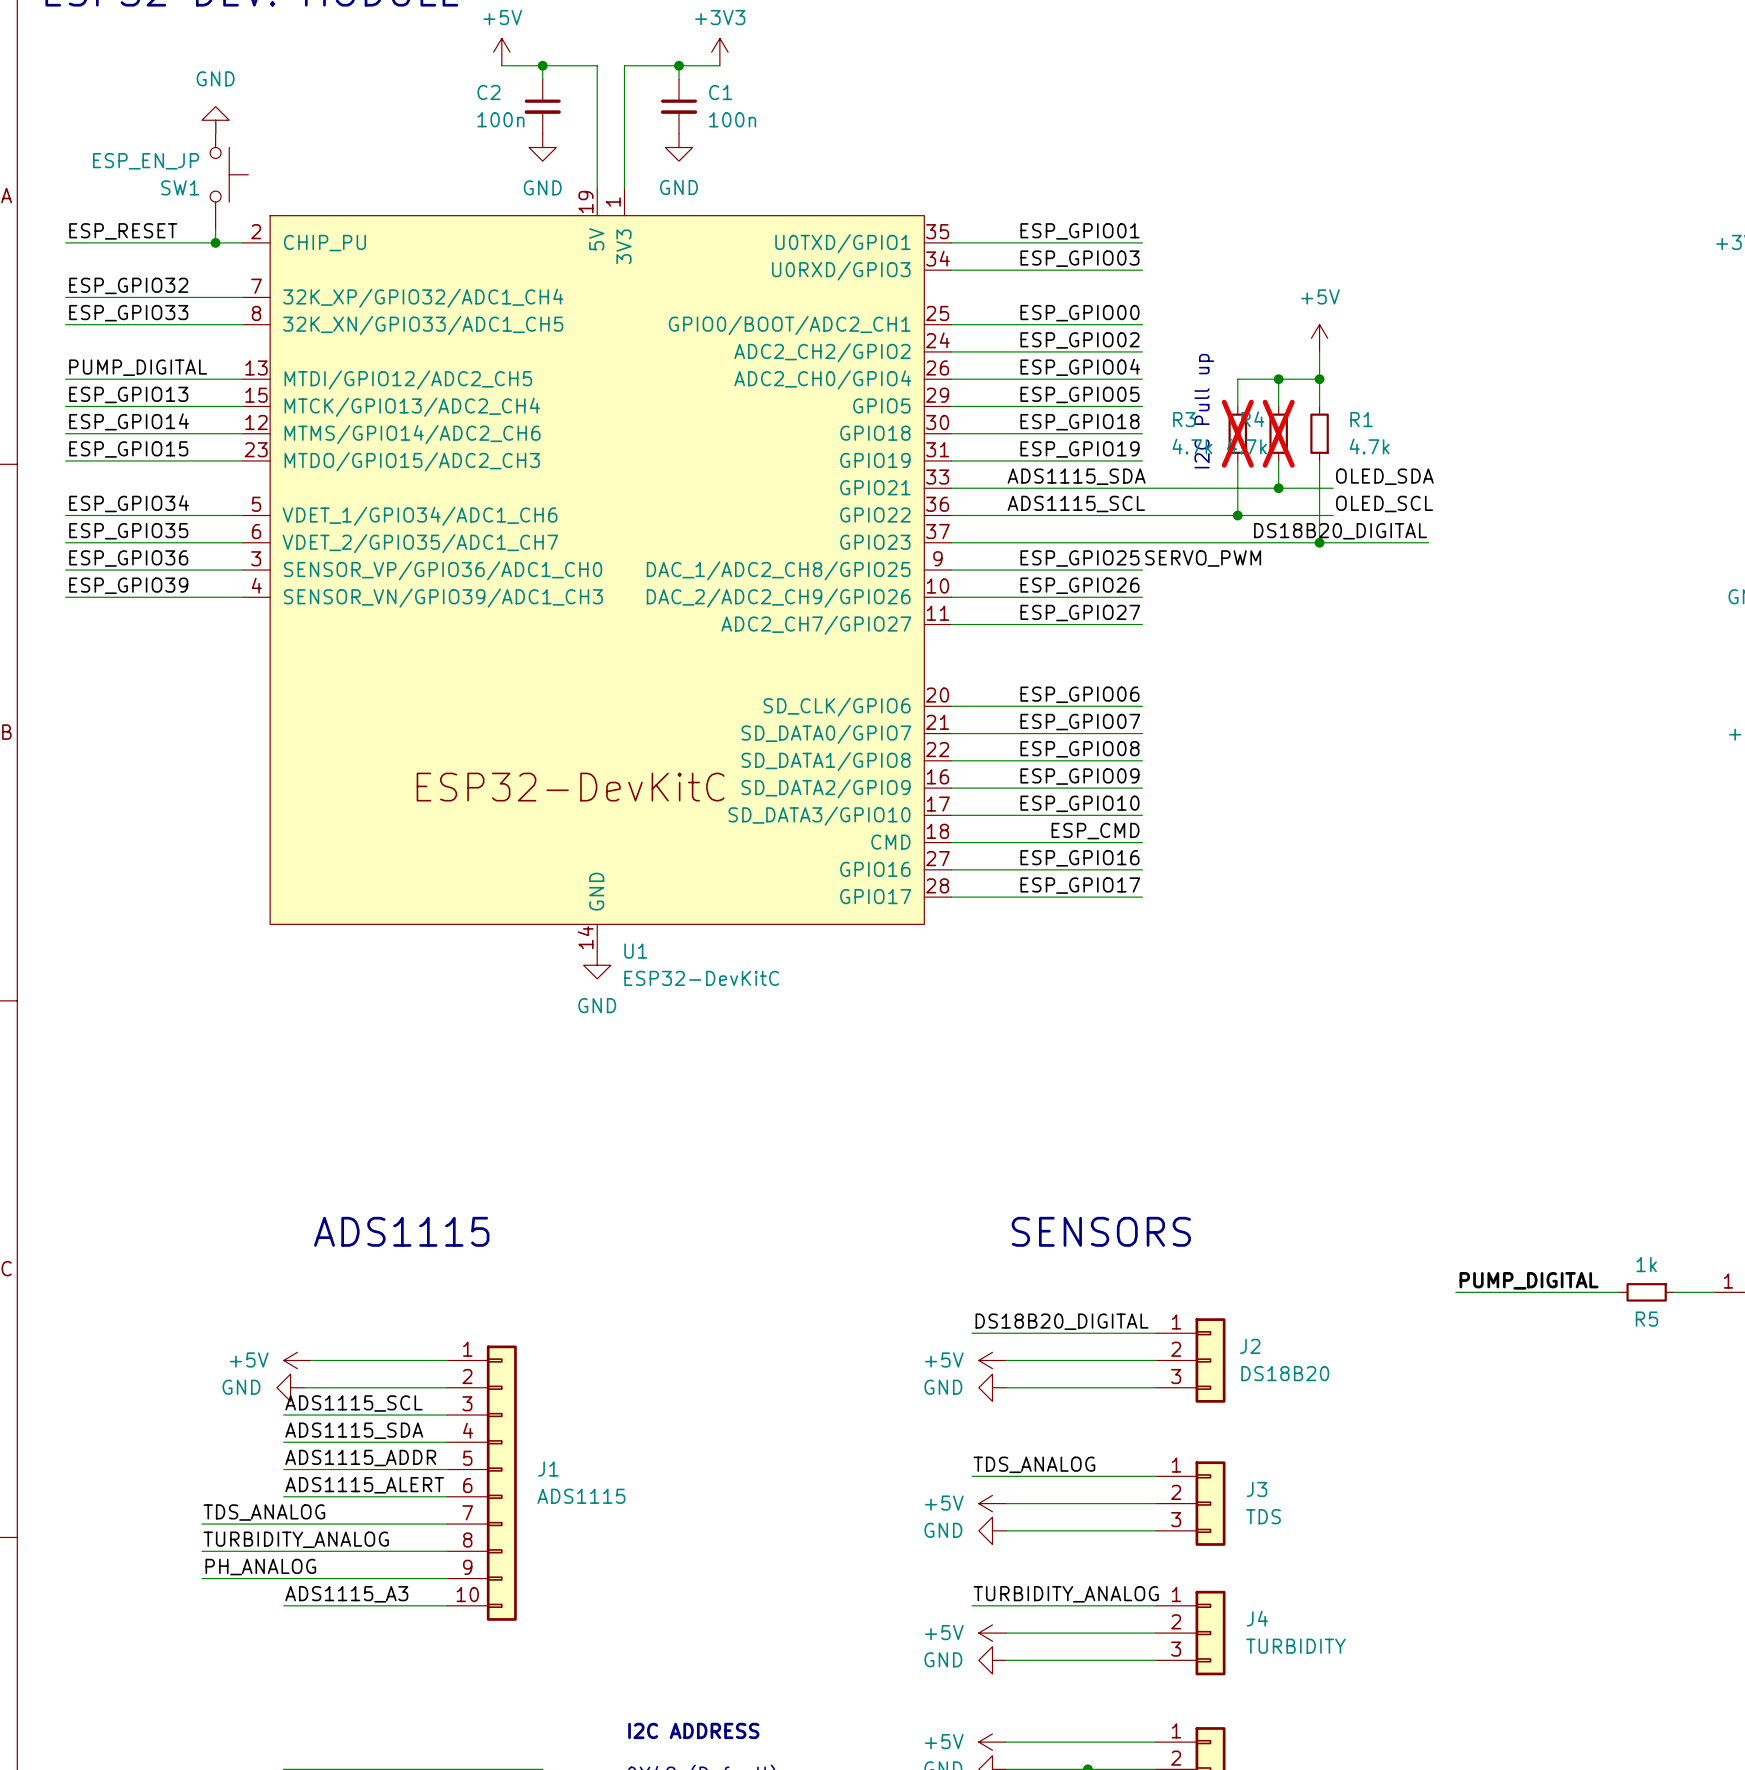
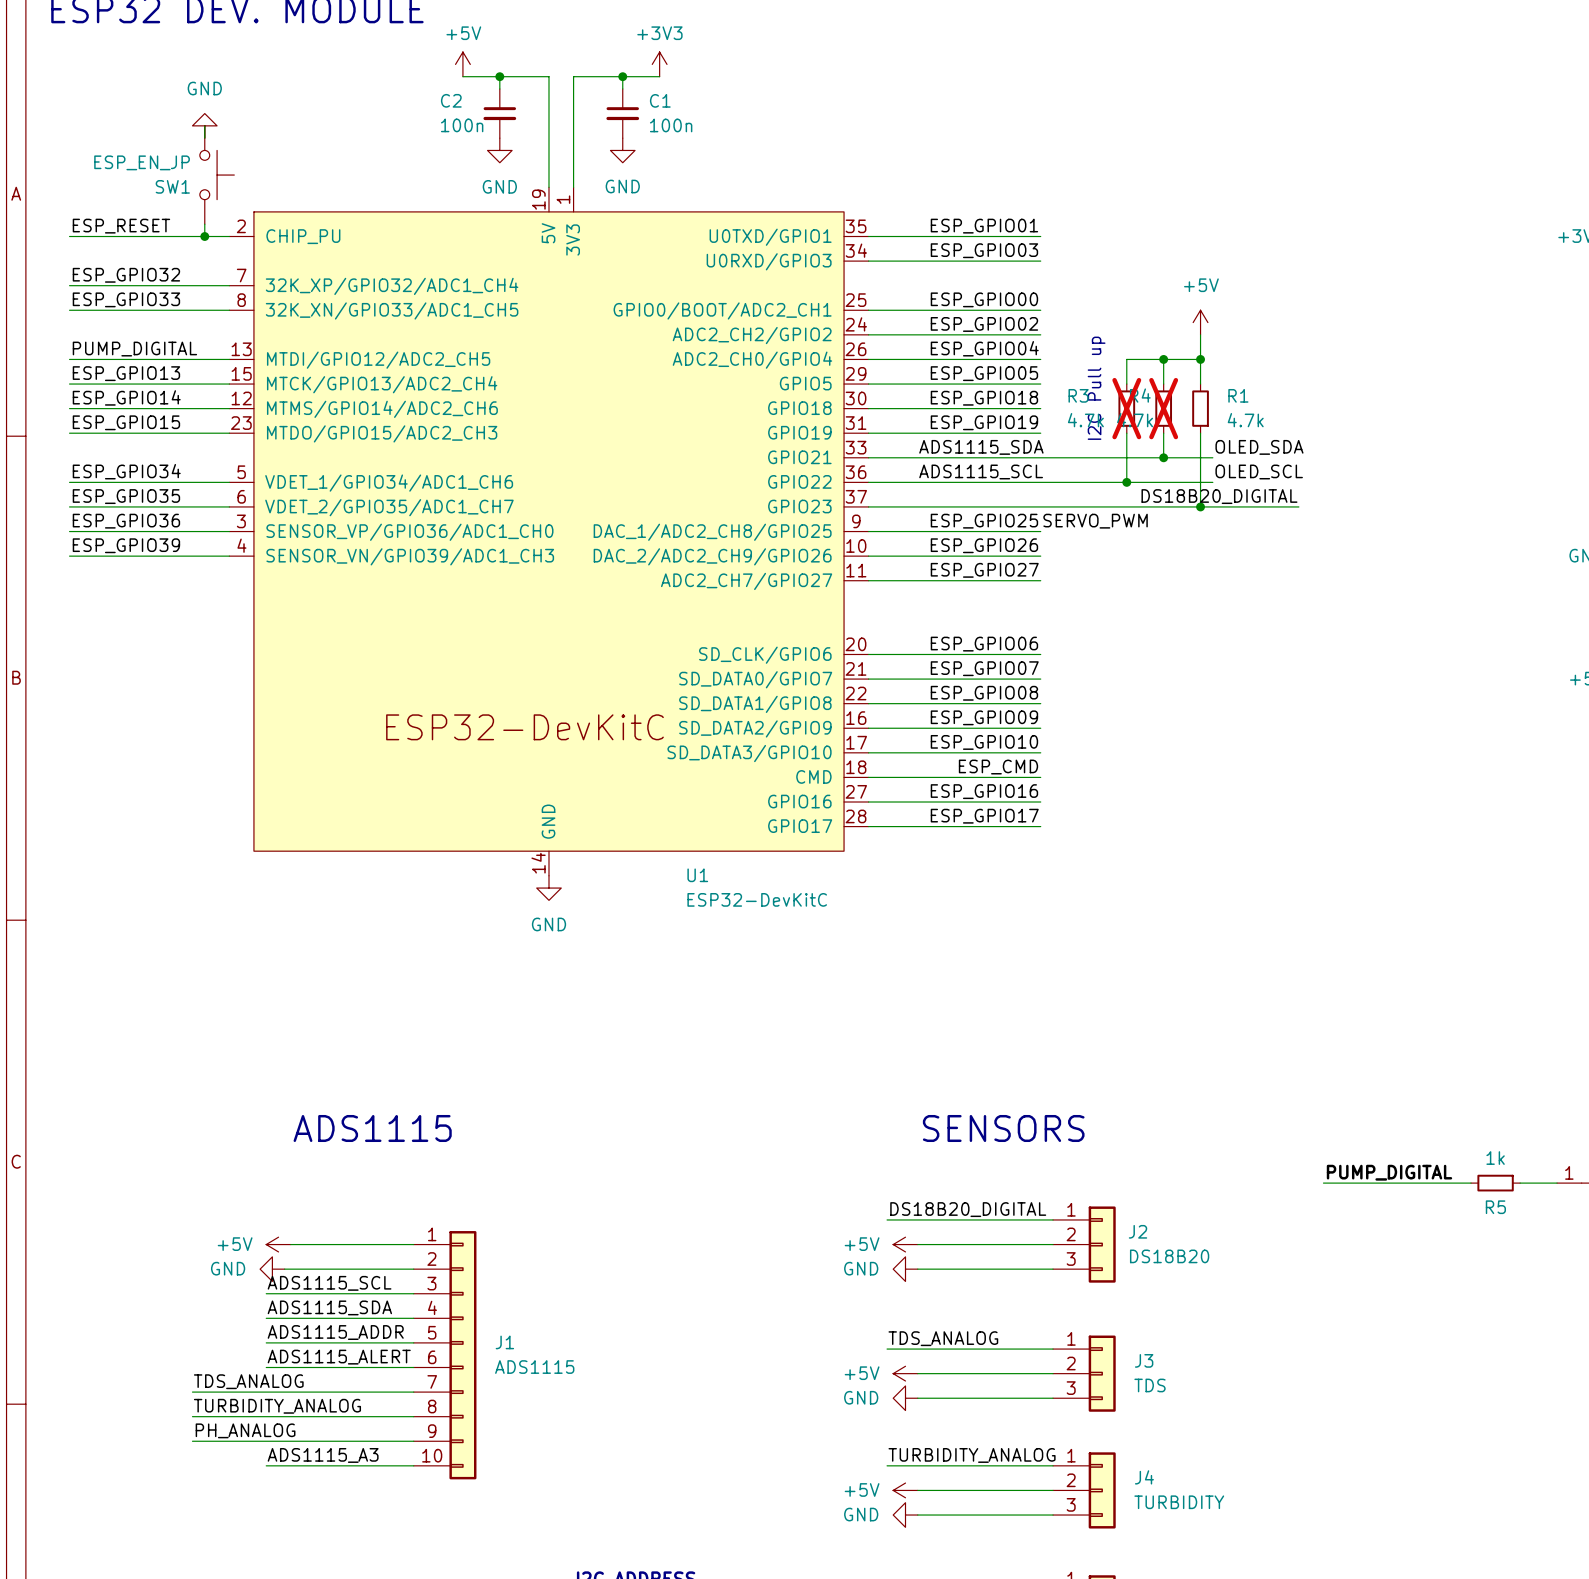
U1 name position: U1 (635, 951) -> U1 (697, 875)
U1 value position: ESP32-DevKitC (701, 978) -> ESP32-DevKitC (757, 899)

